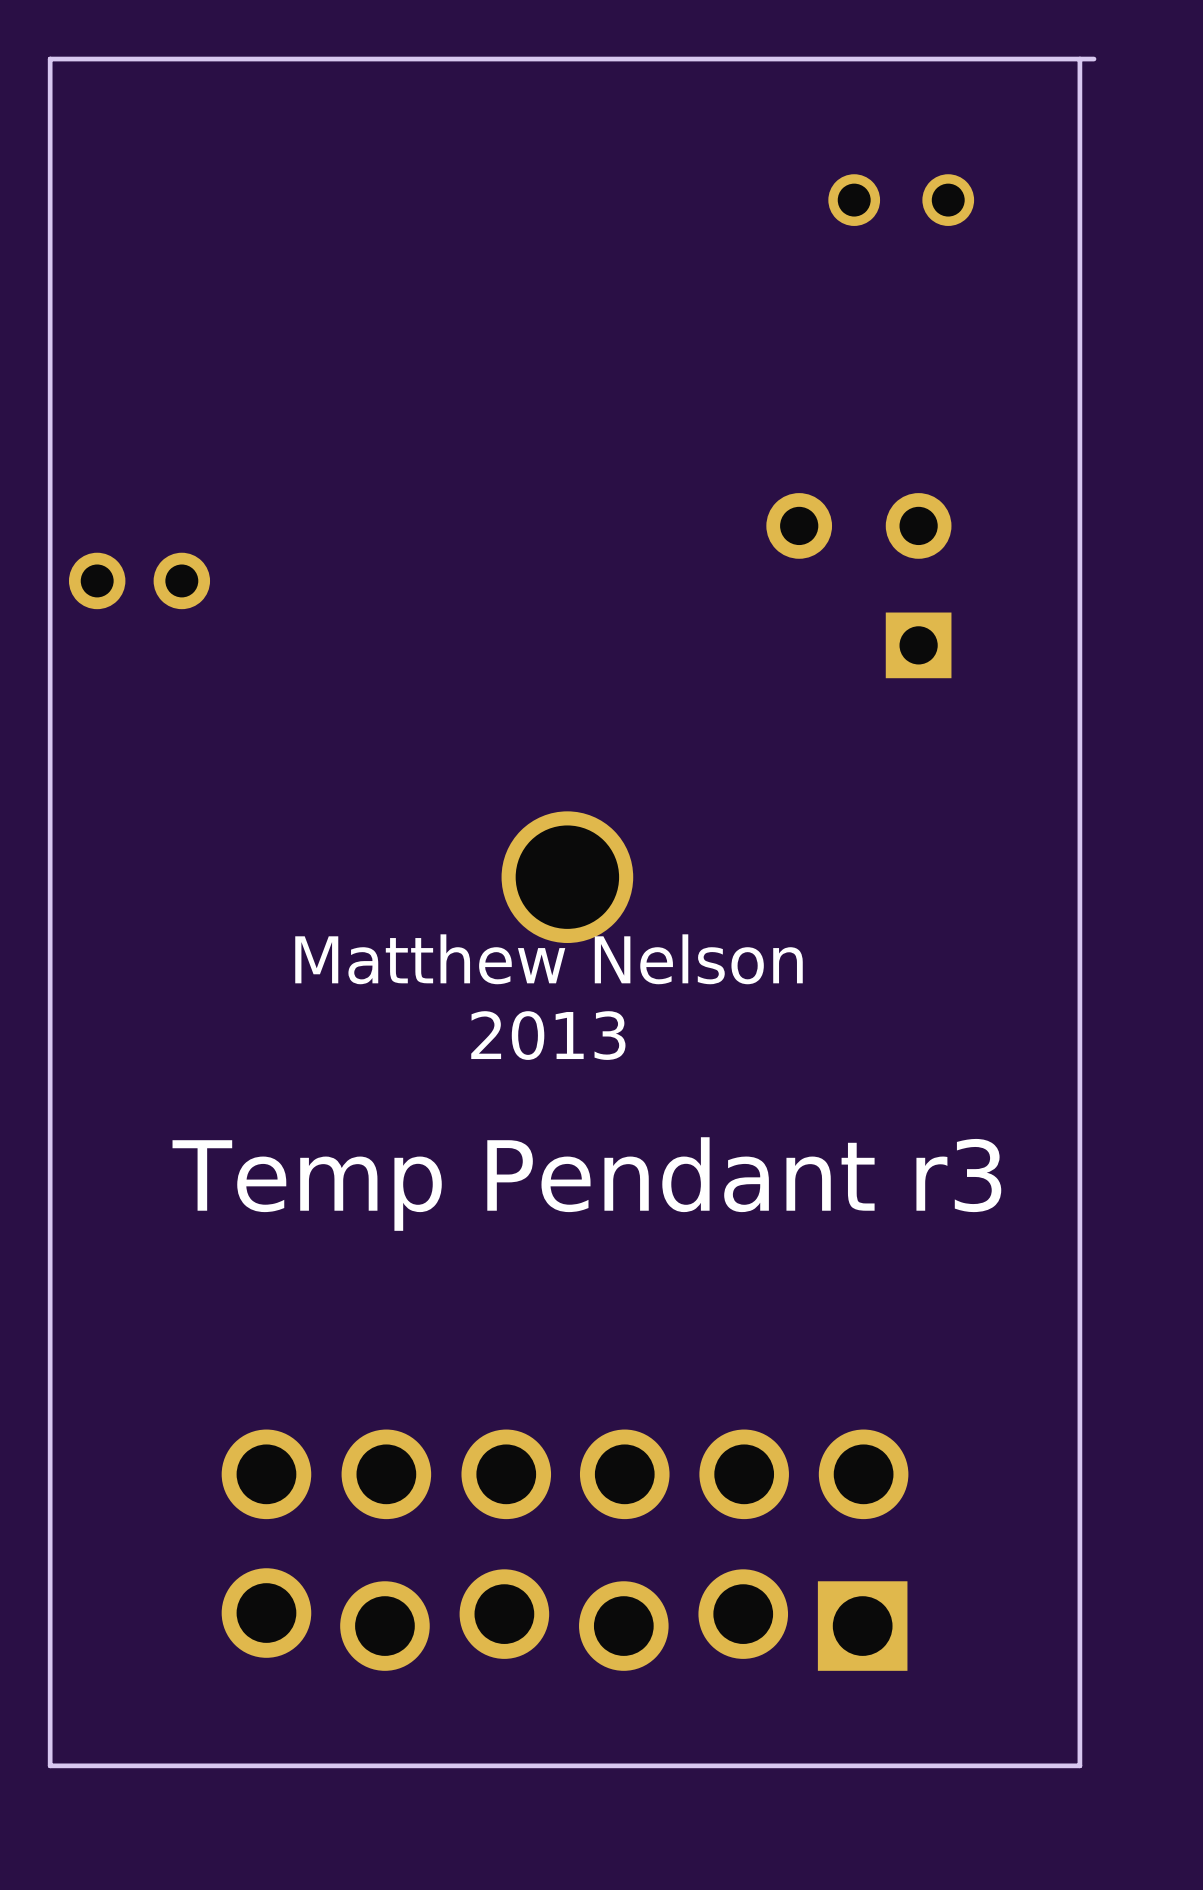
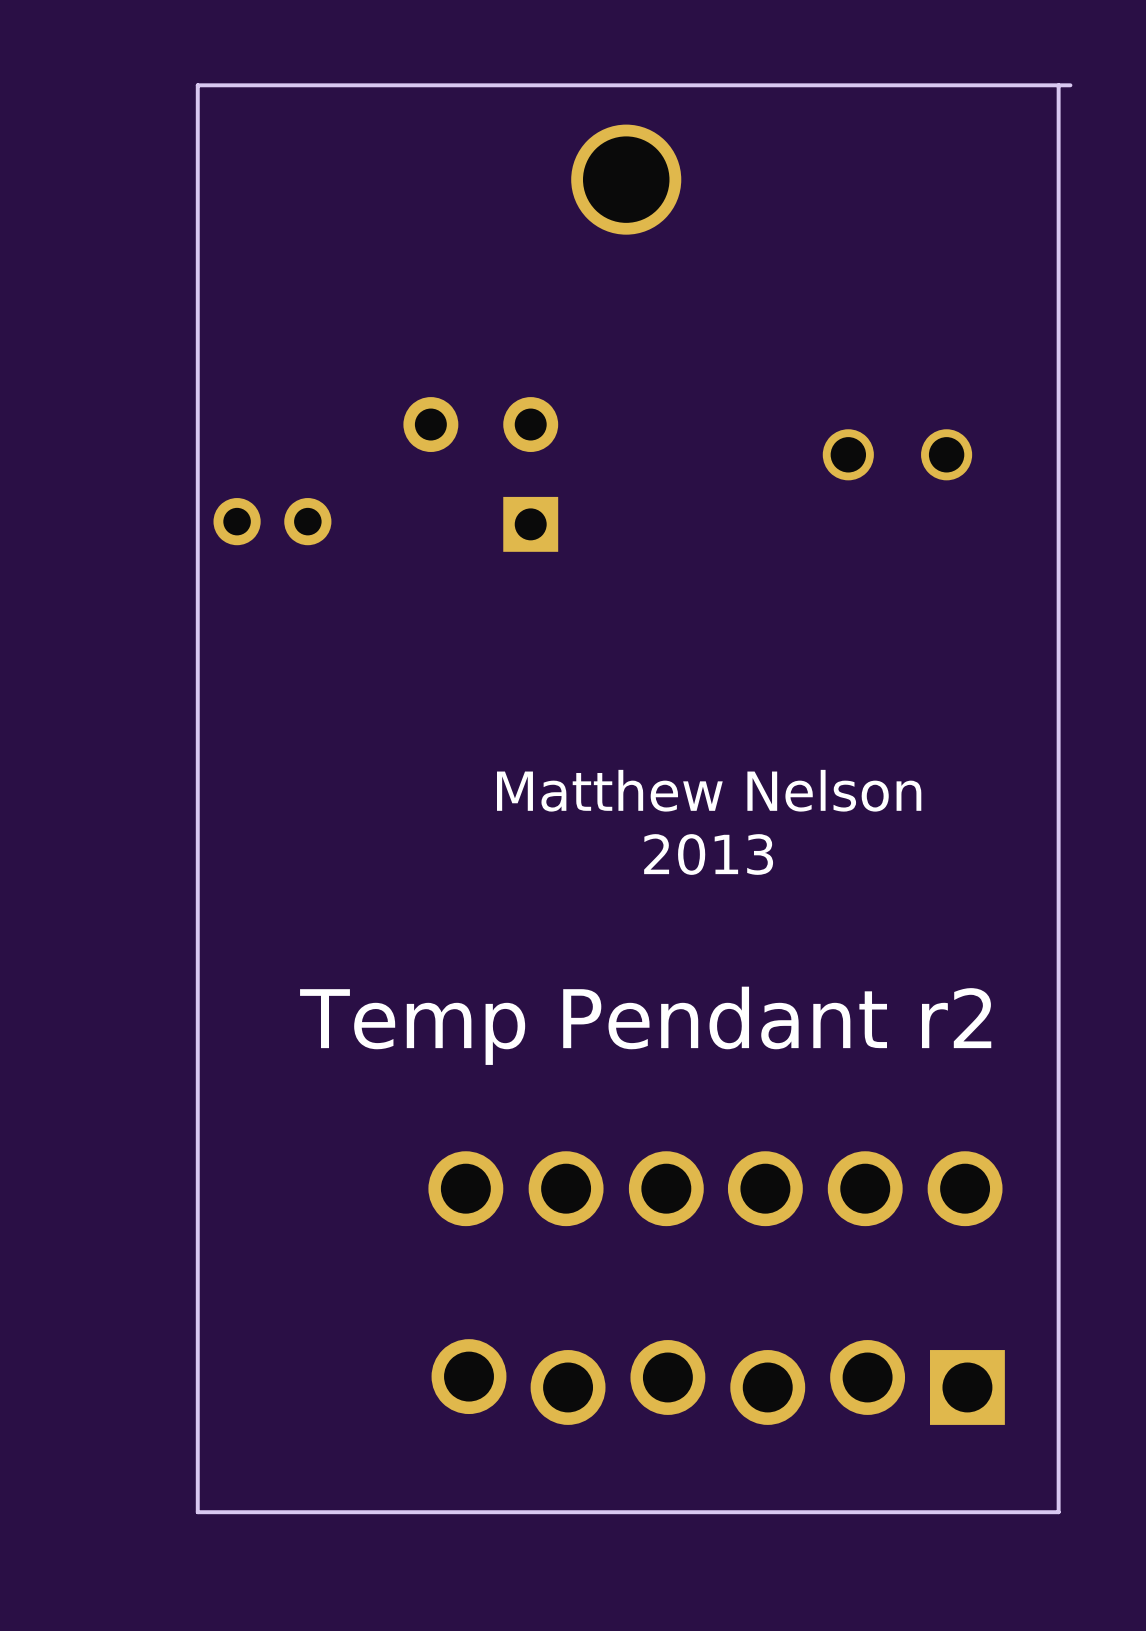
part: (901, 200) -> none
part: none -> (897, 454)
part position: (858, 585) -> (480, 474)
part position: (567, 877) -> (626, 179)
text position: Matthew Nelson (549, 959) -> Matthew Nelson (709, 790)
text position: 2013 (548, 1035) -> 2013 (708, 854)
text: Temp Pendant r3 (586, 1184) -> Temp Pendant r2 (645, 1025)
part position: (565, 1474) -> (715, 1188)
part position: (564, 1619) -> (718, 1382)

